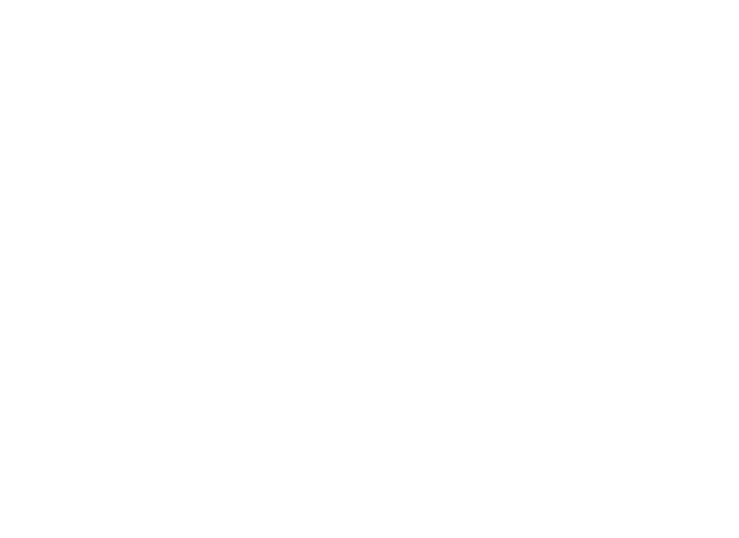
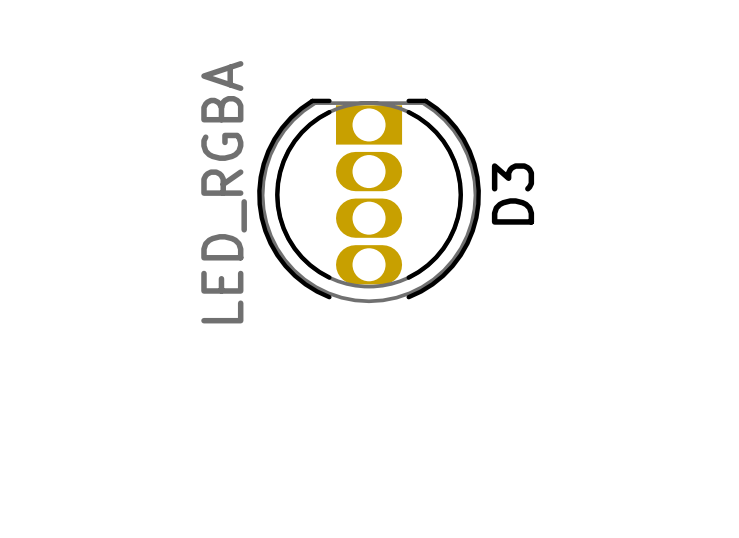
D3: none -> LED_RGBA (369, 200)

